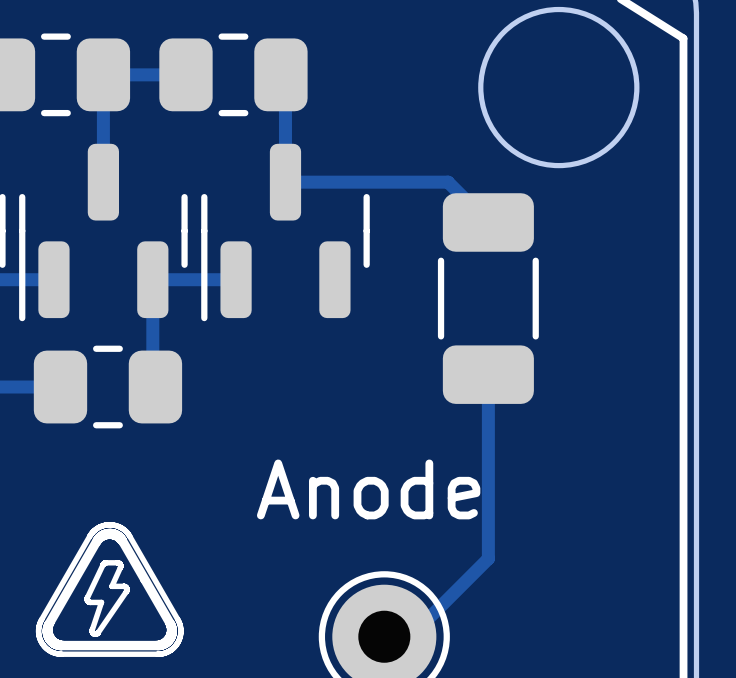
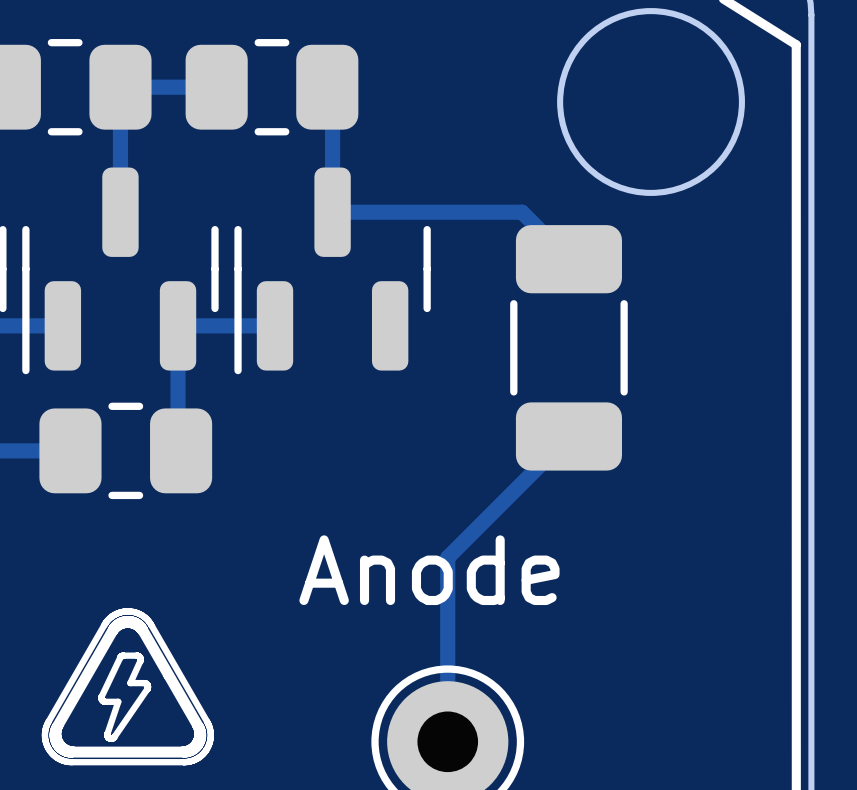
track: (488, 374) (488, 558) (410, 636) (384, 636) -> (568, 436) (447, 557) (447, 741)

